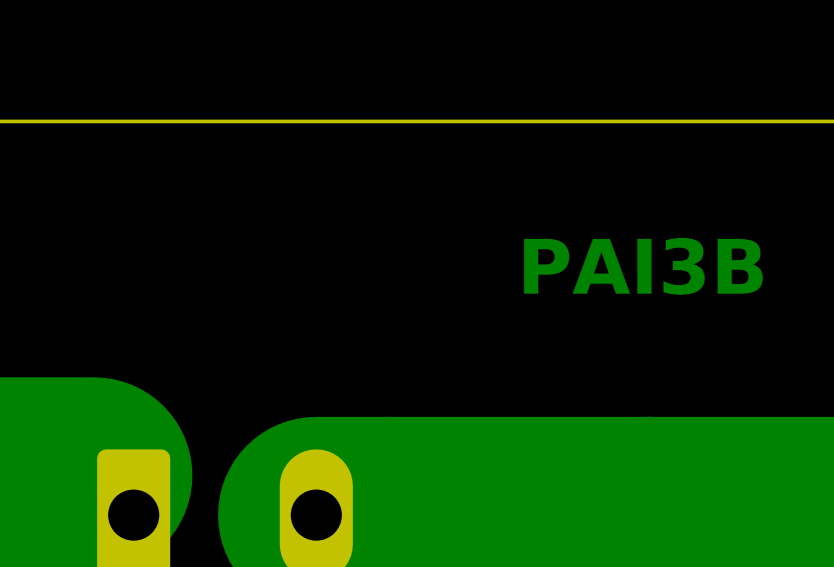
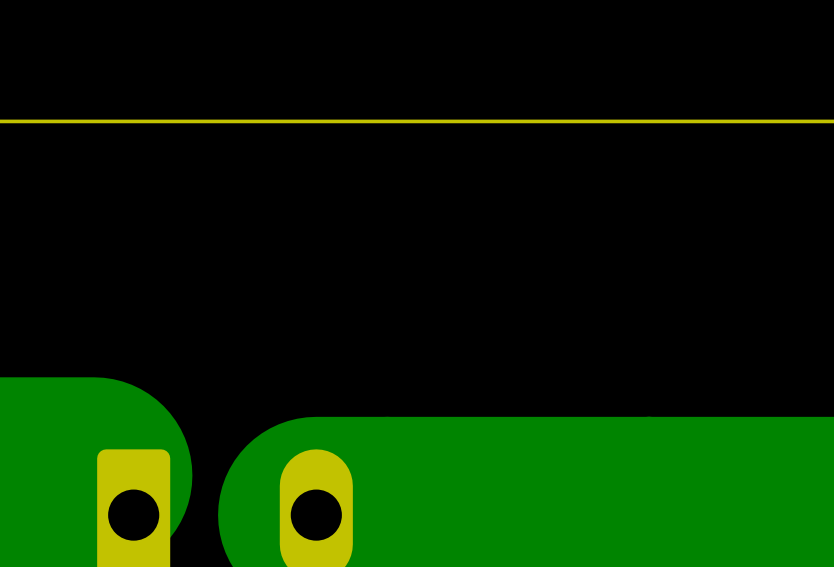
text: PAI3B (643, 266) -> none

